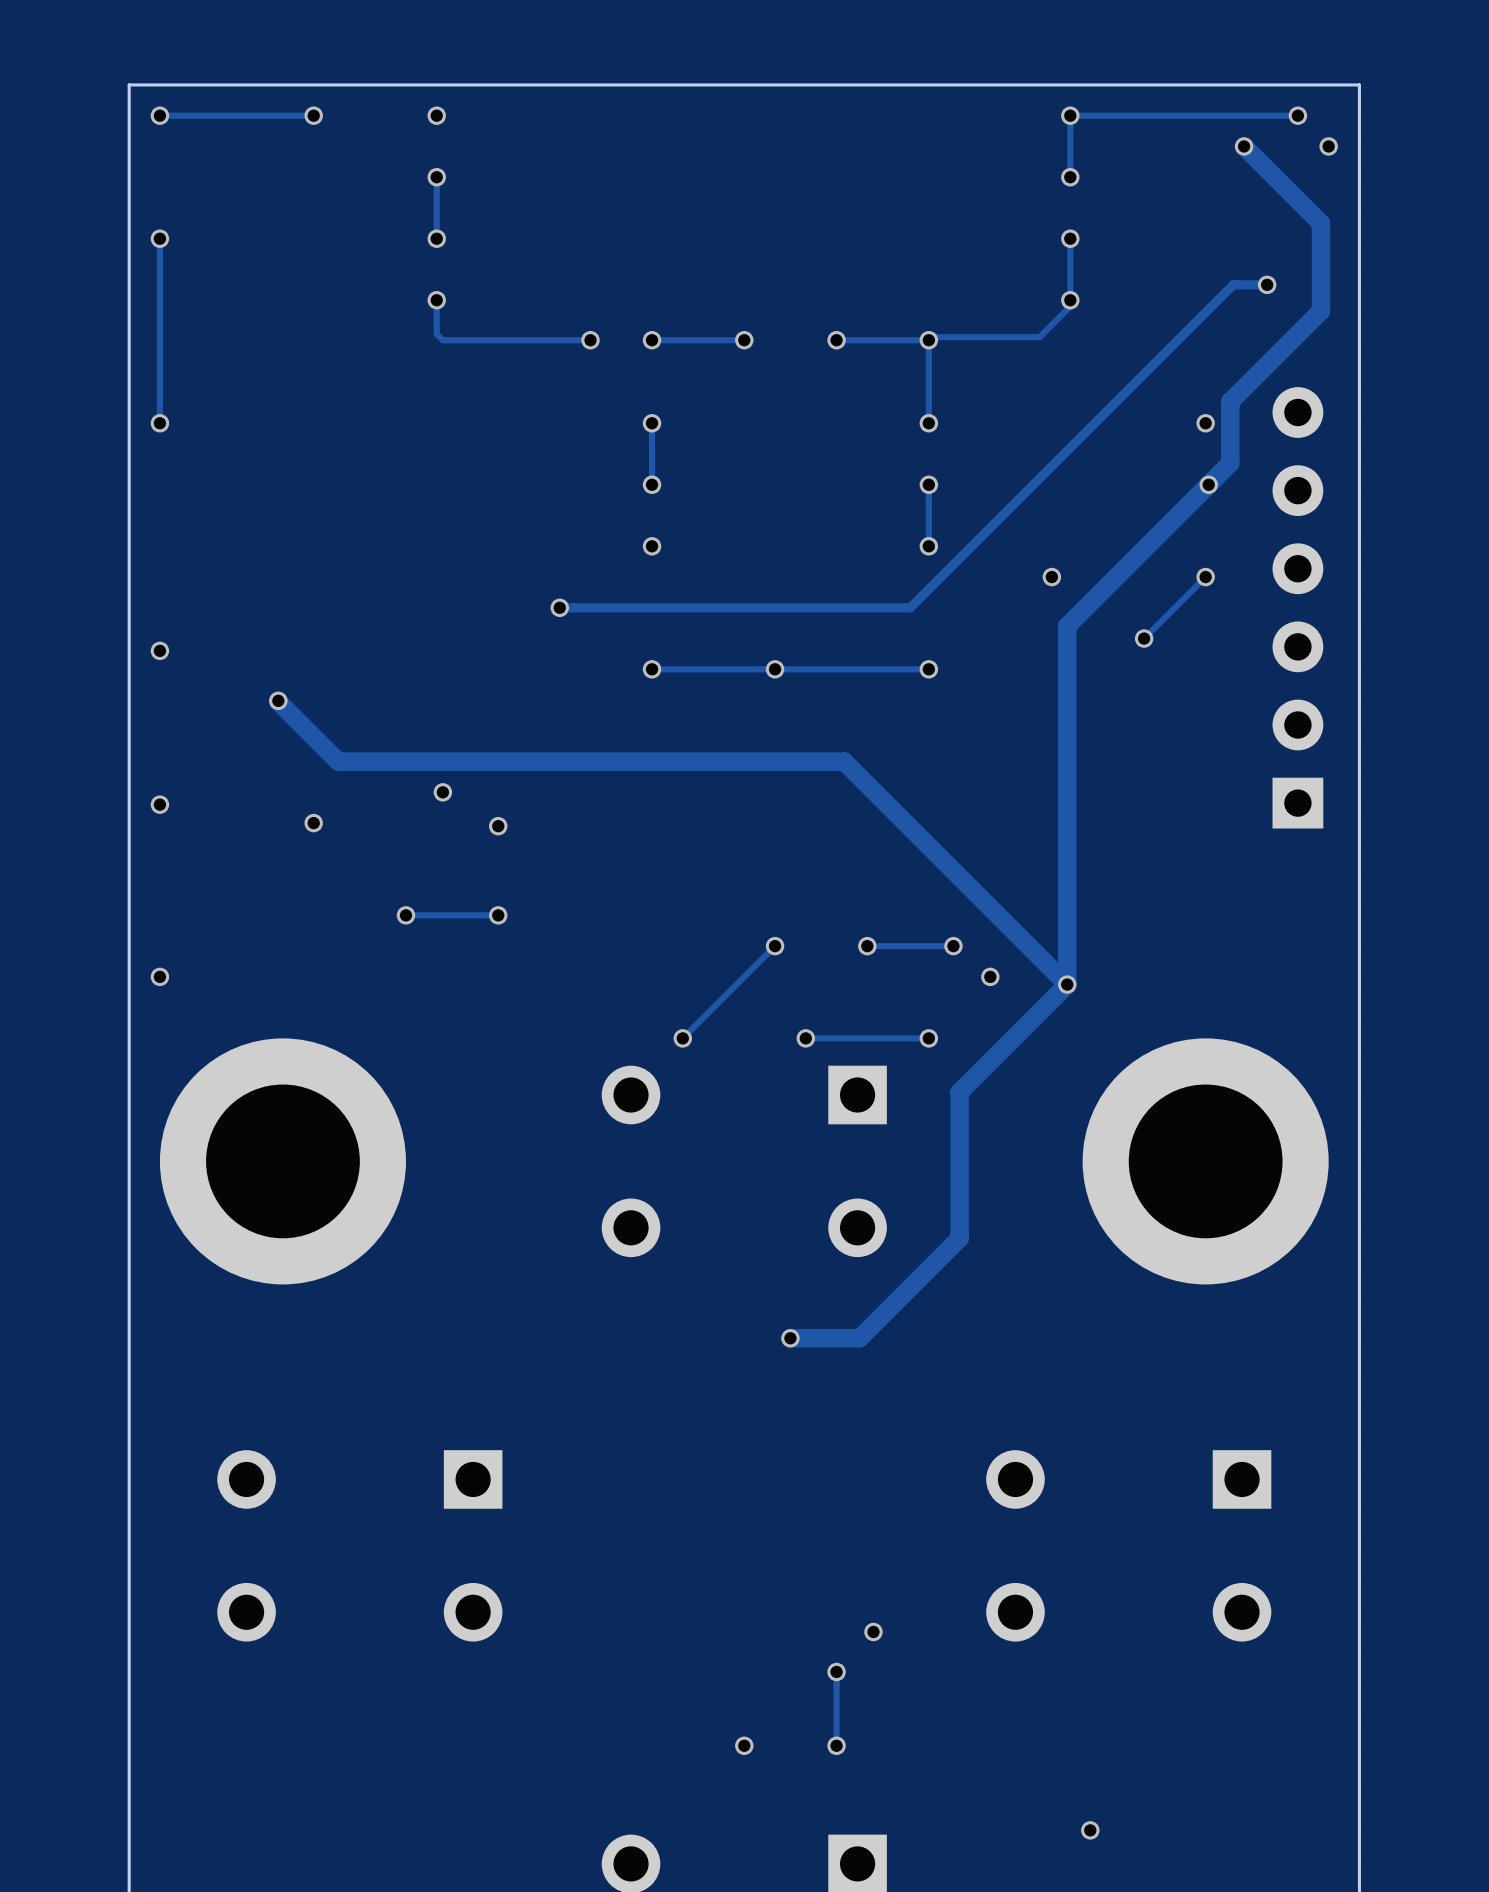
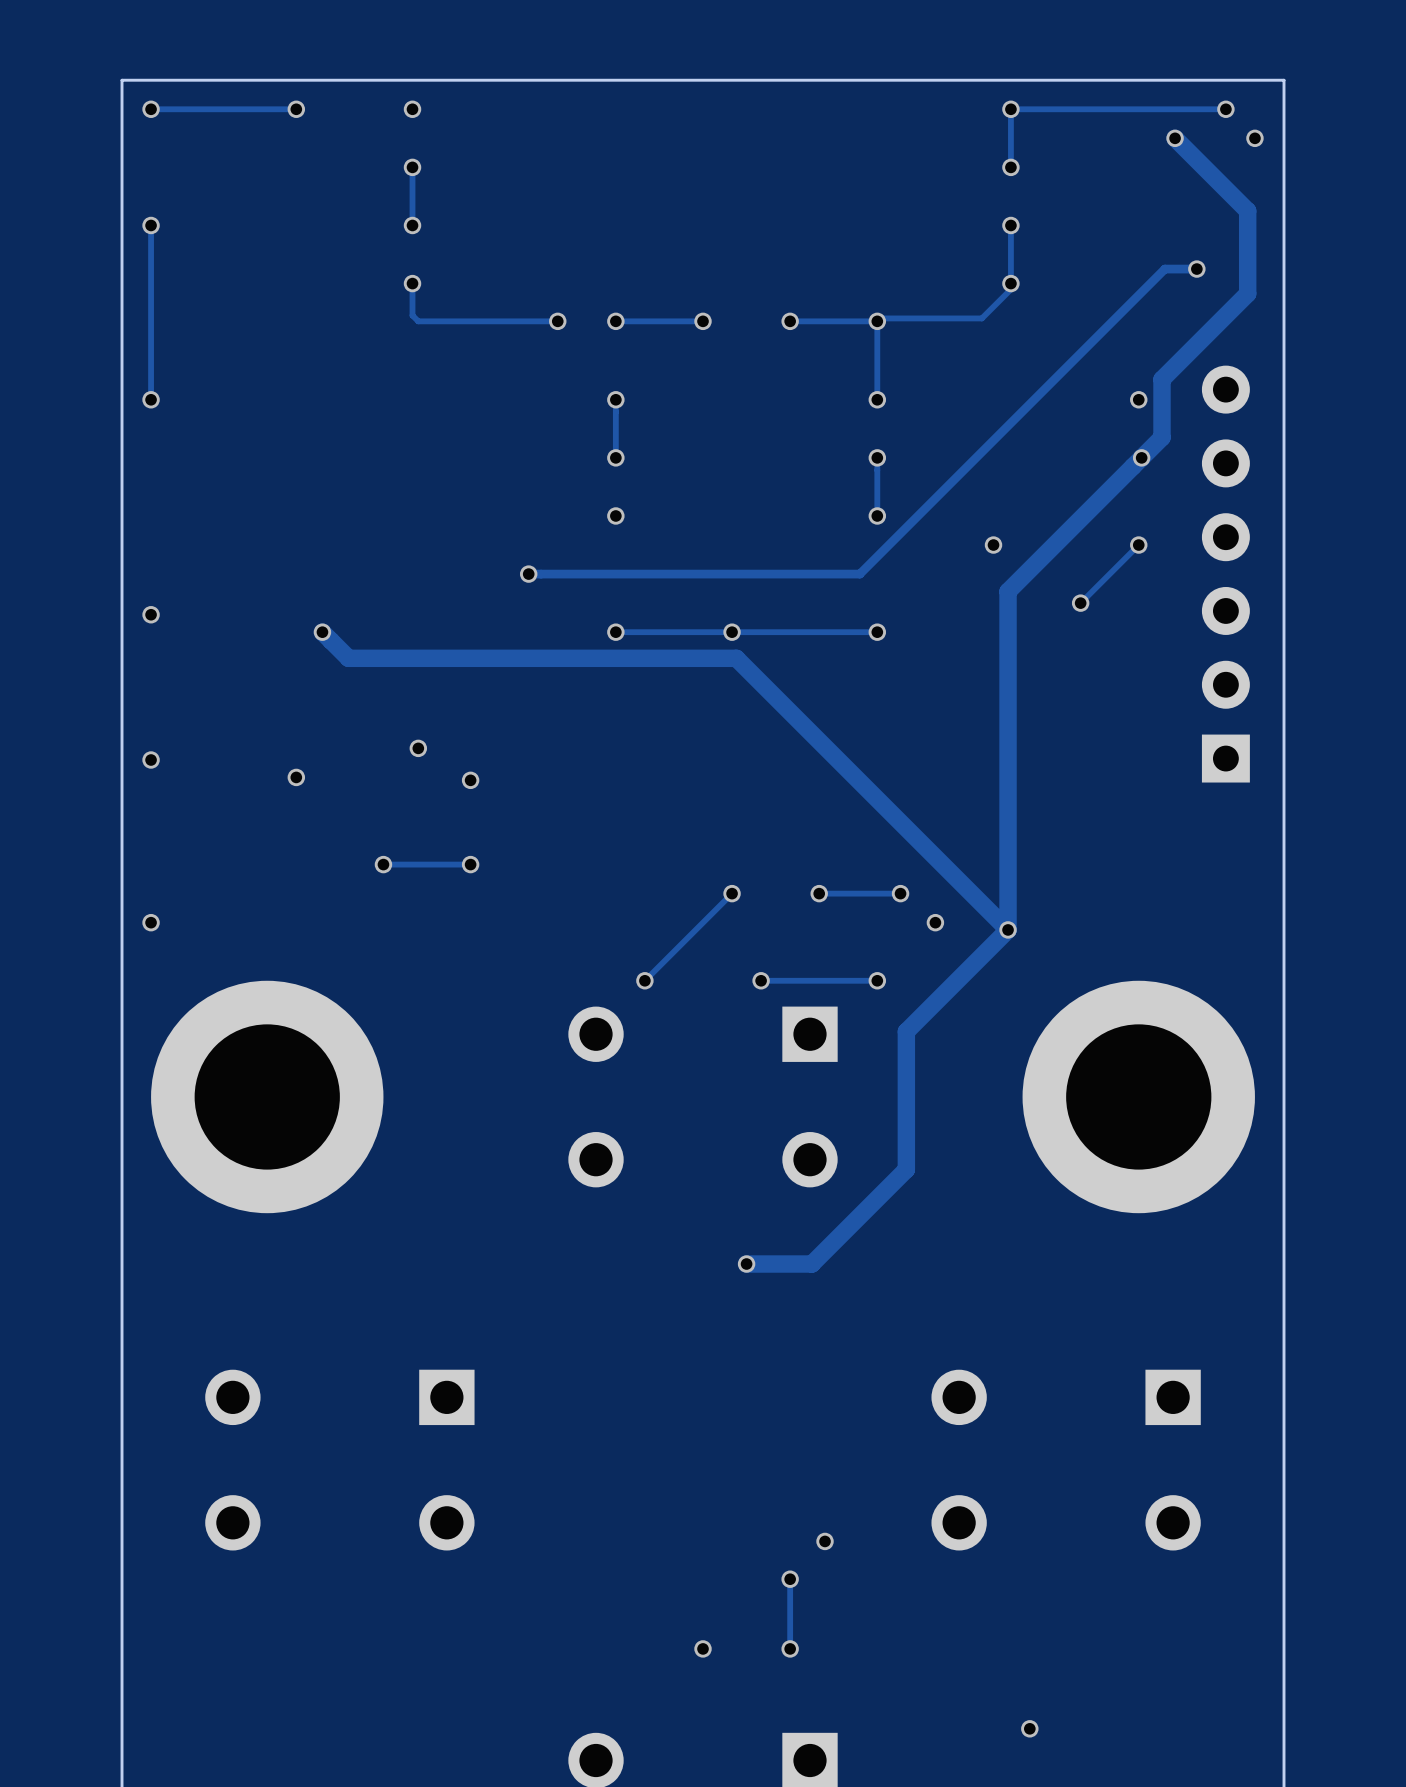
track: (278, 700) (338, 761) (844, 761) -> (322, 632) (348, 658) (736, 658) (797, 719)
via position: (278, 700) -> (322, 632)

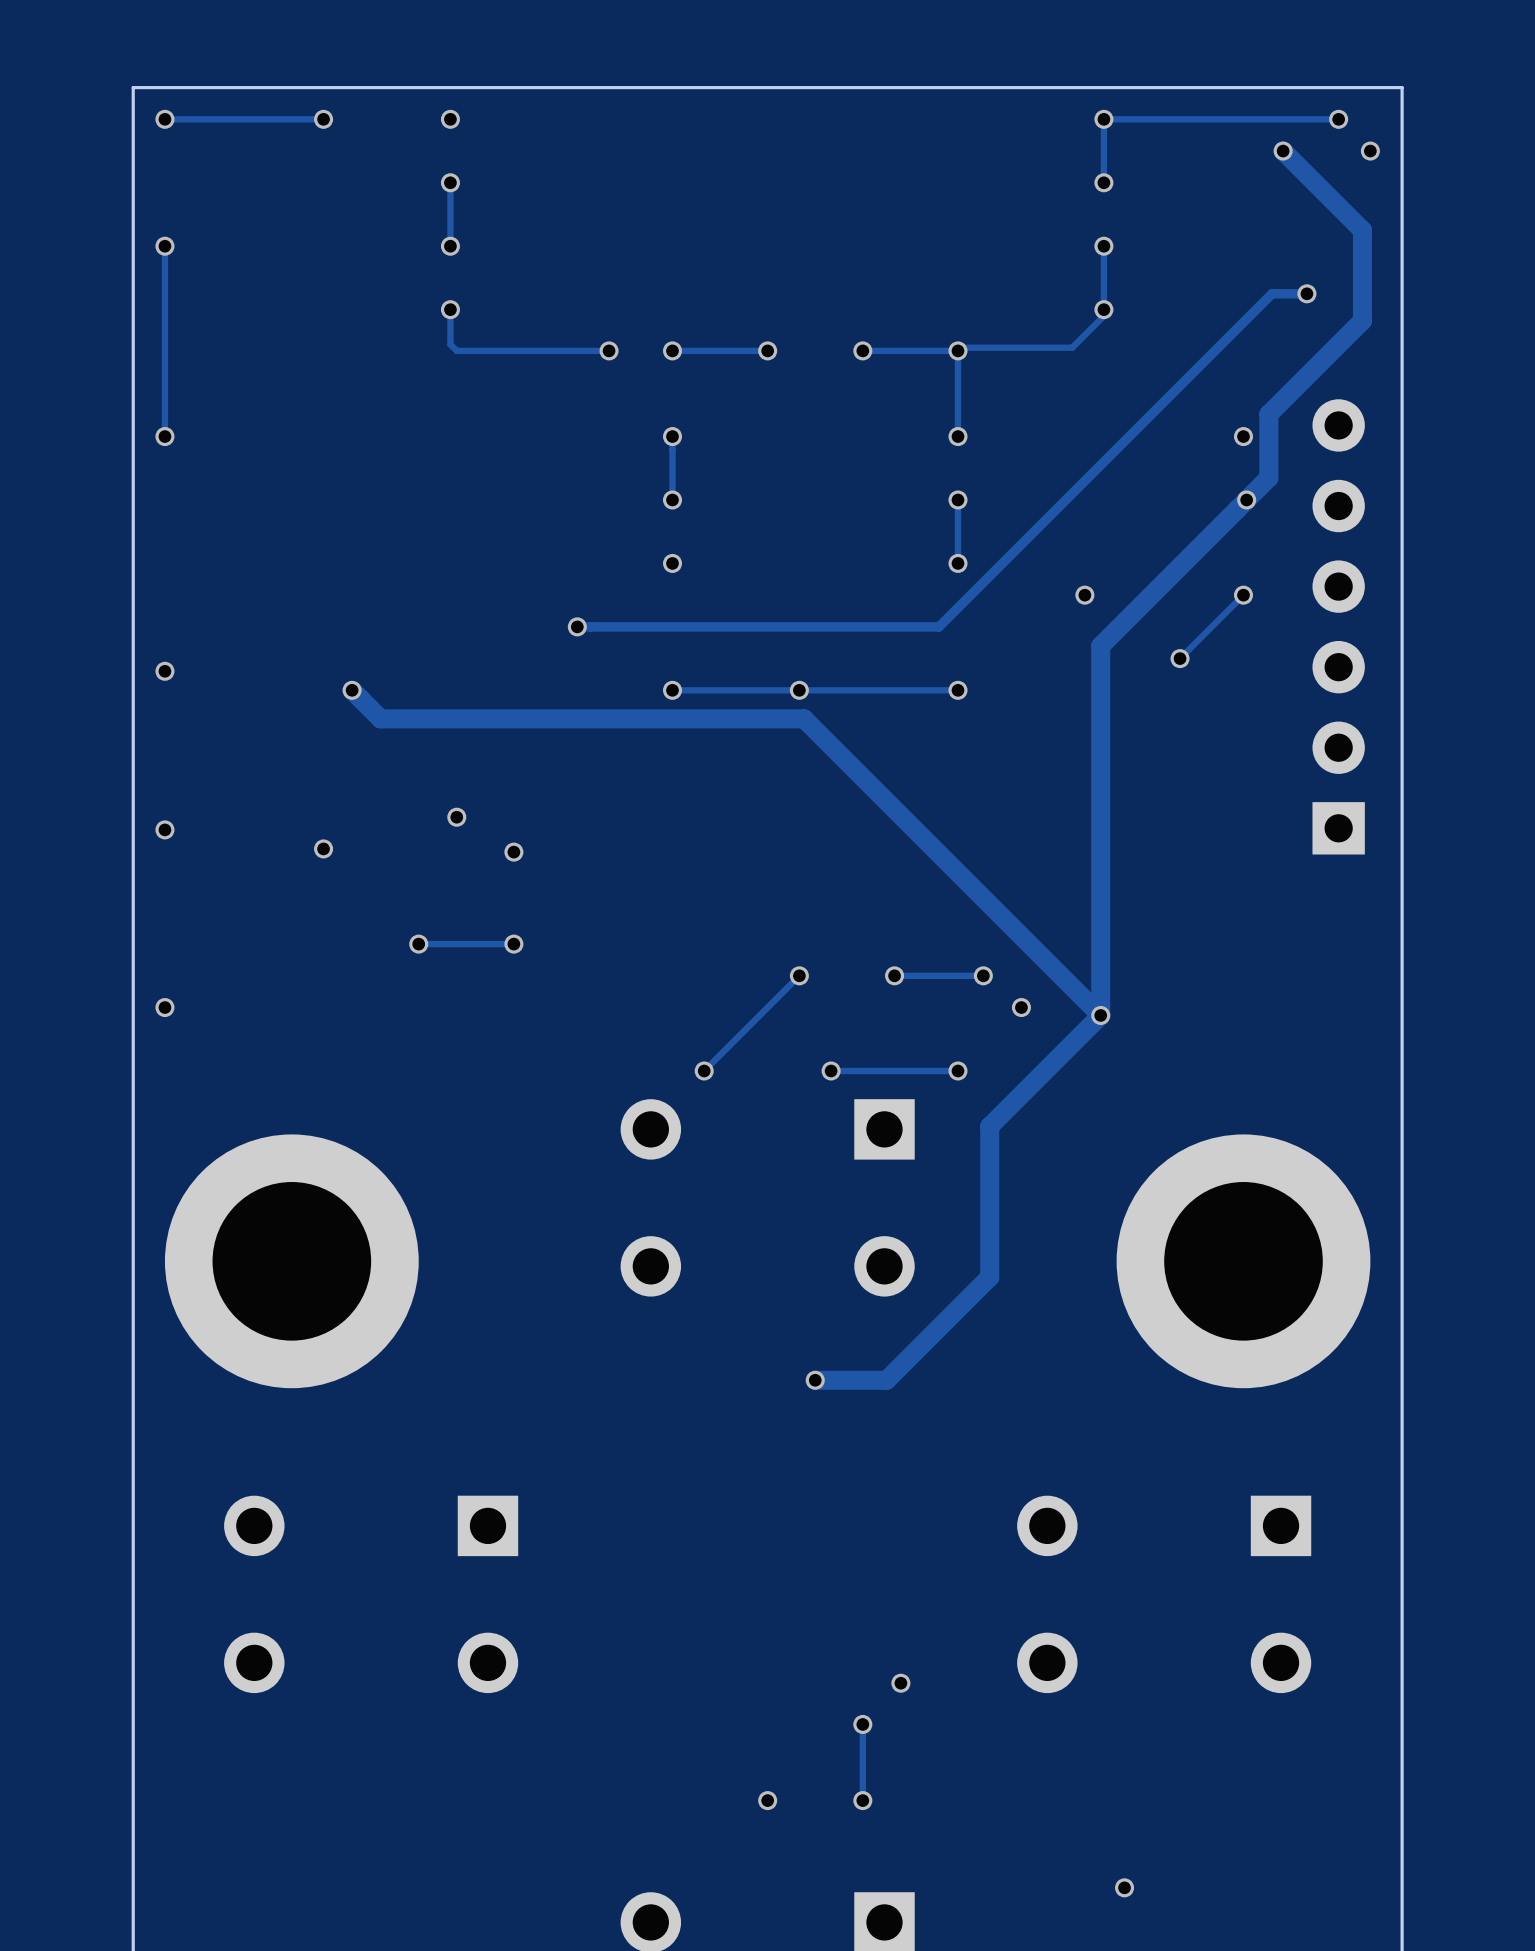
part position: (267, 1096) -> (291, 1261)
part position: (1138, 1096) -> (1243, 1261)

